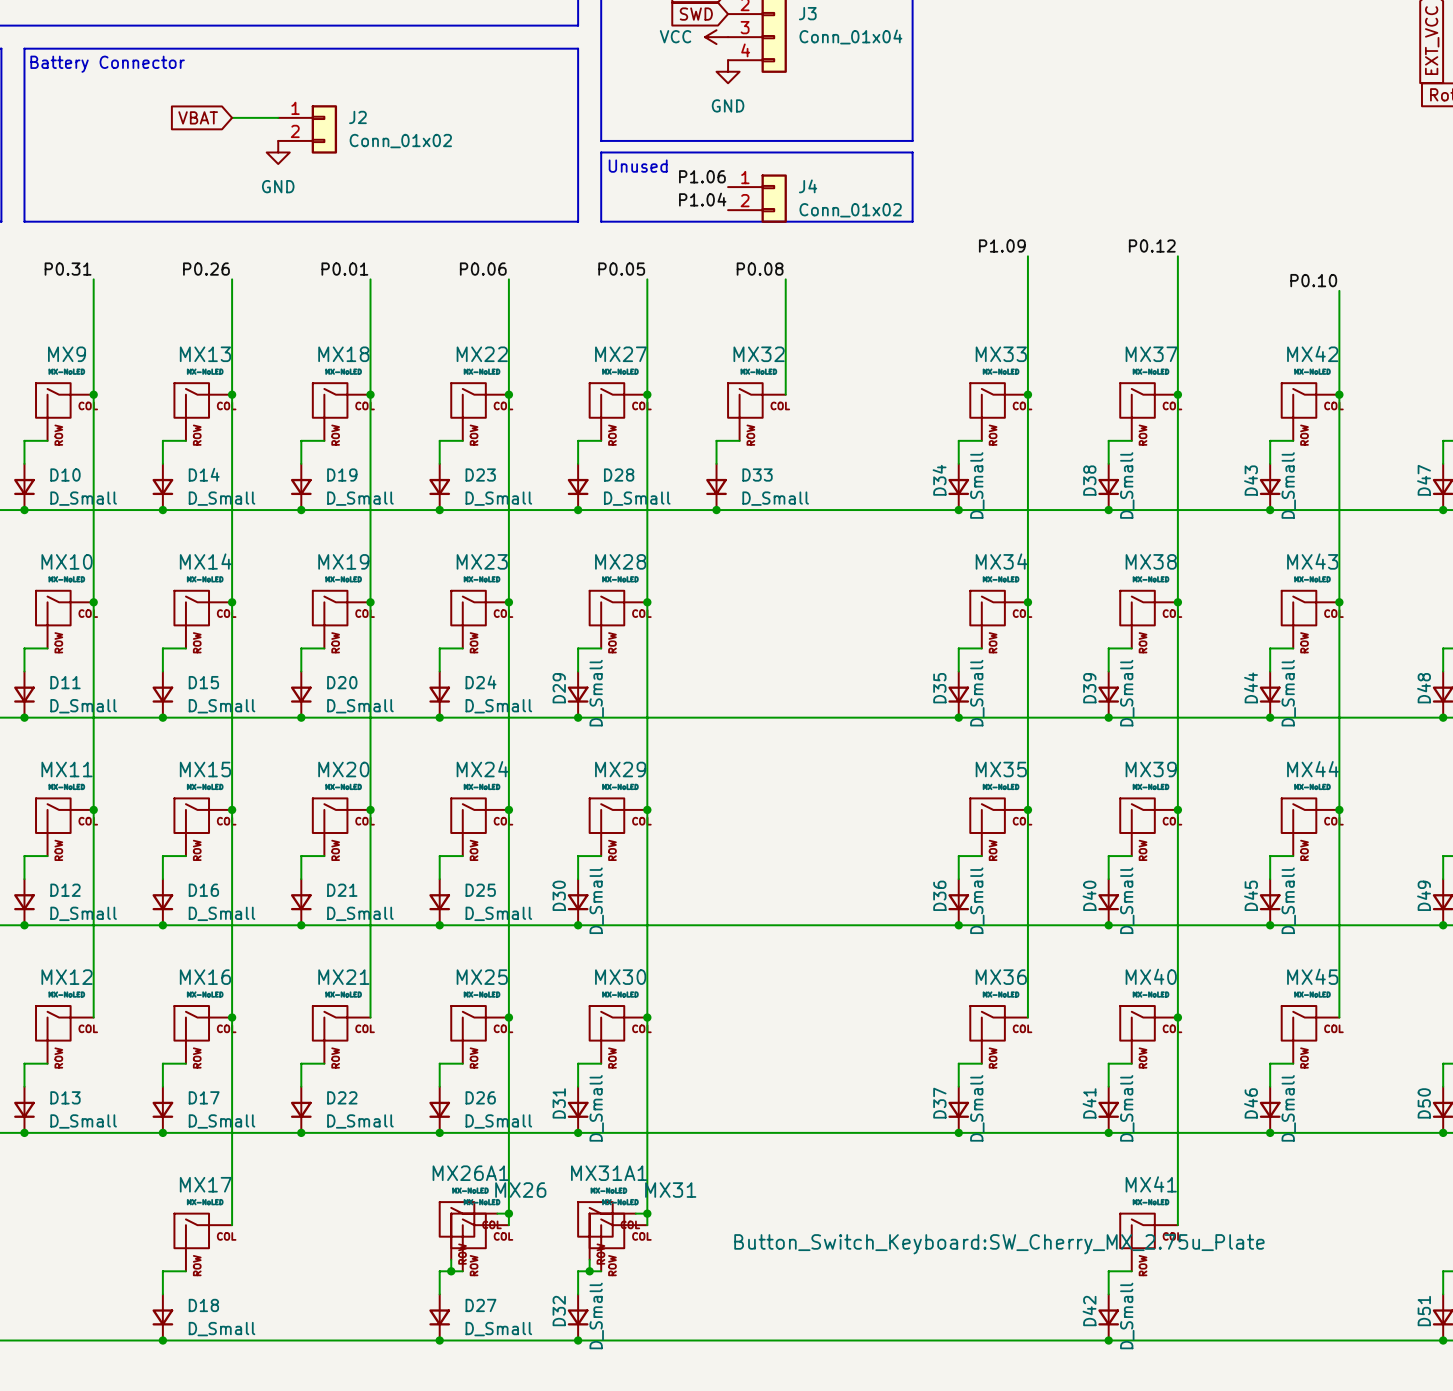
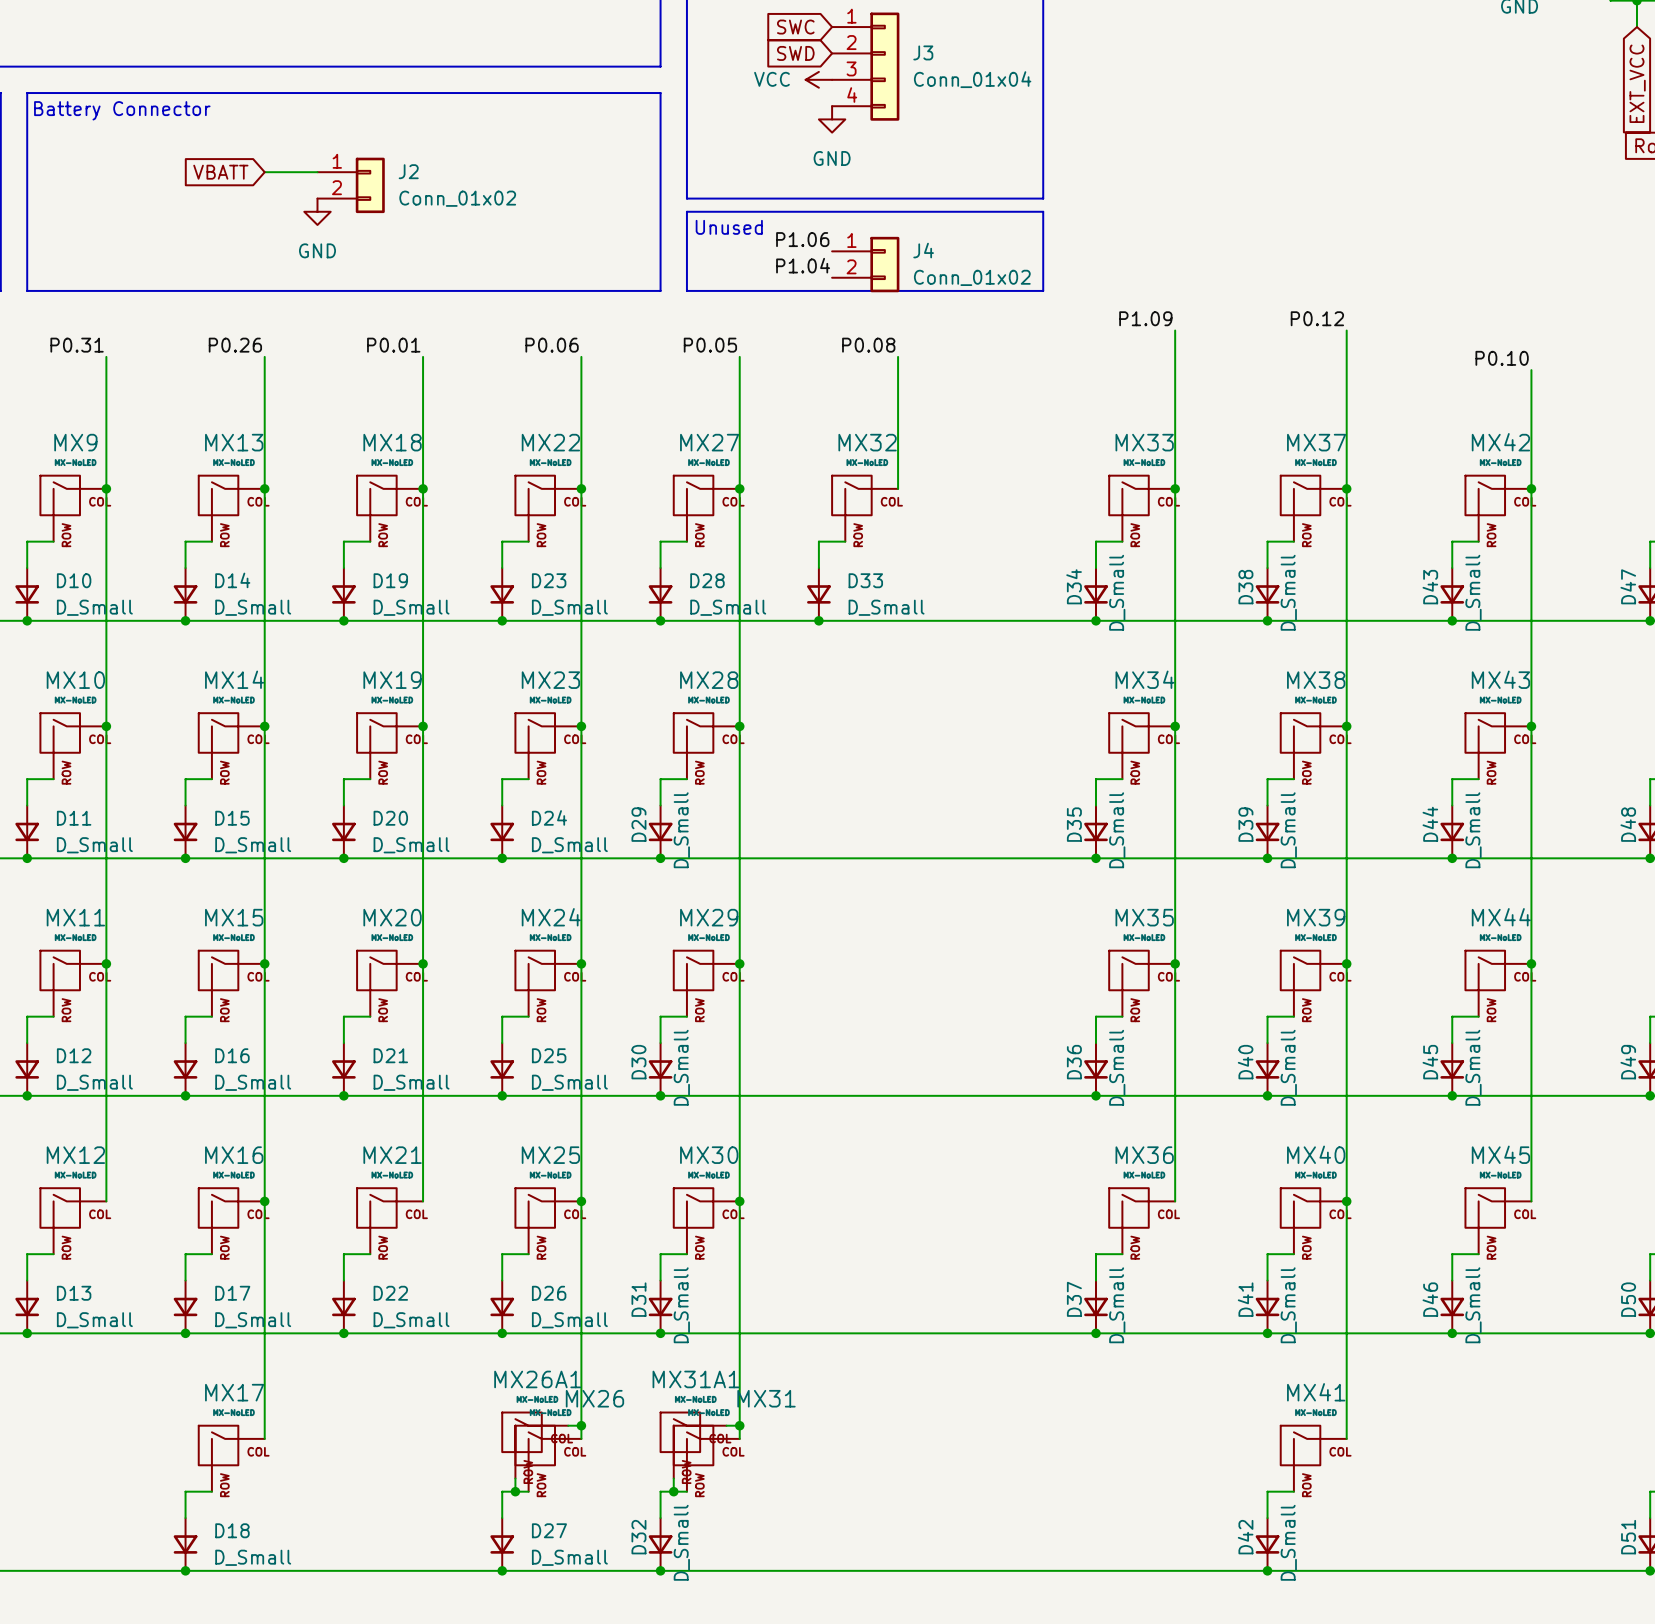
global label: VBAT (198, 117) -> VBATT (220, 172)
MX41 text: Button_Switch_Keyboard:SW_Cherry_MX_2.75u_Plate (999, 1244) -> none

